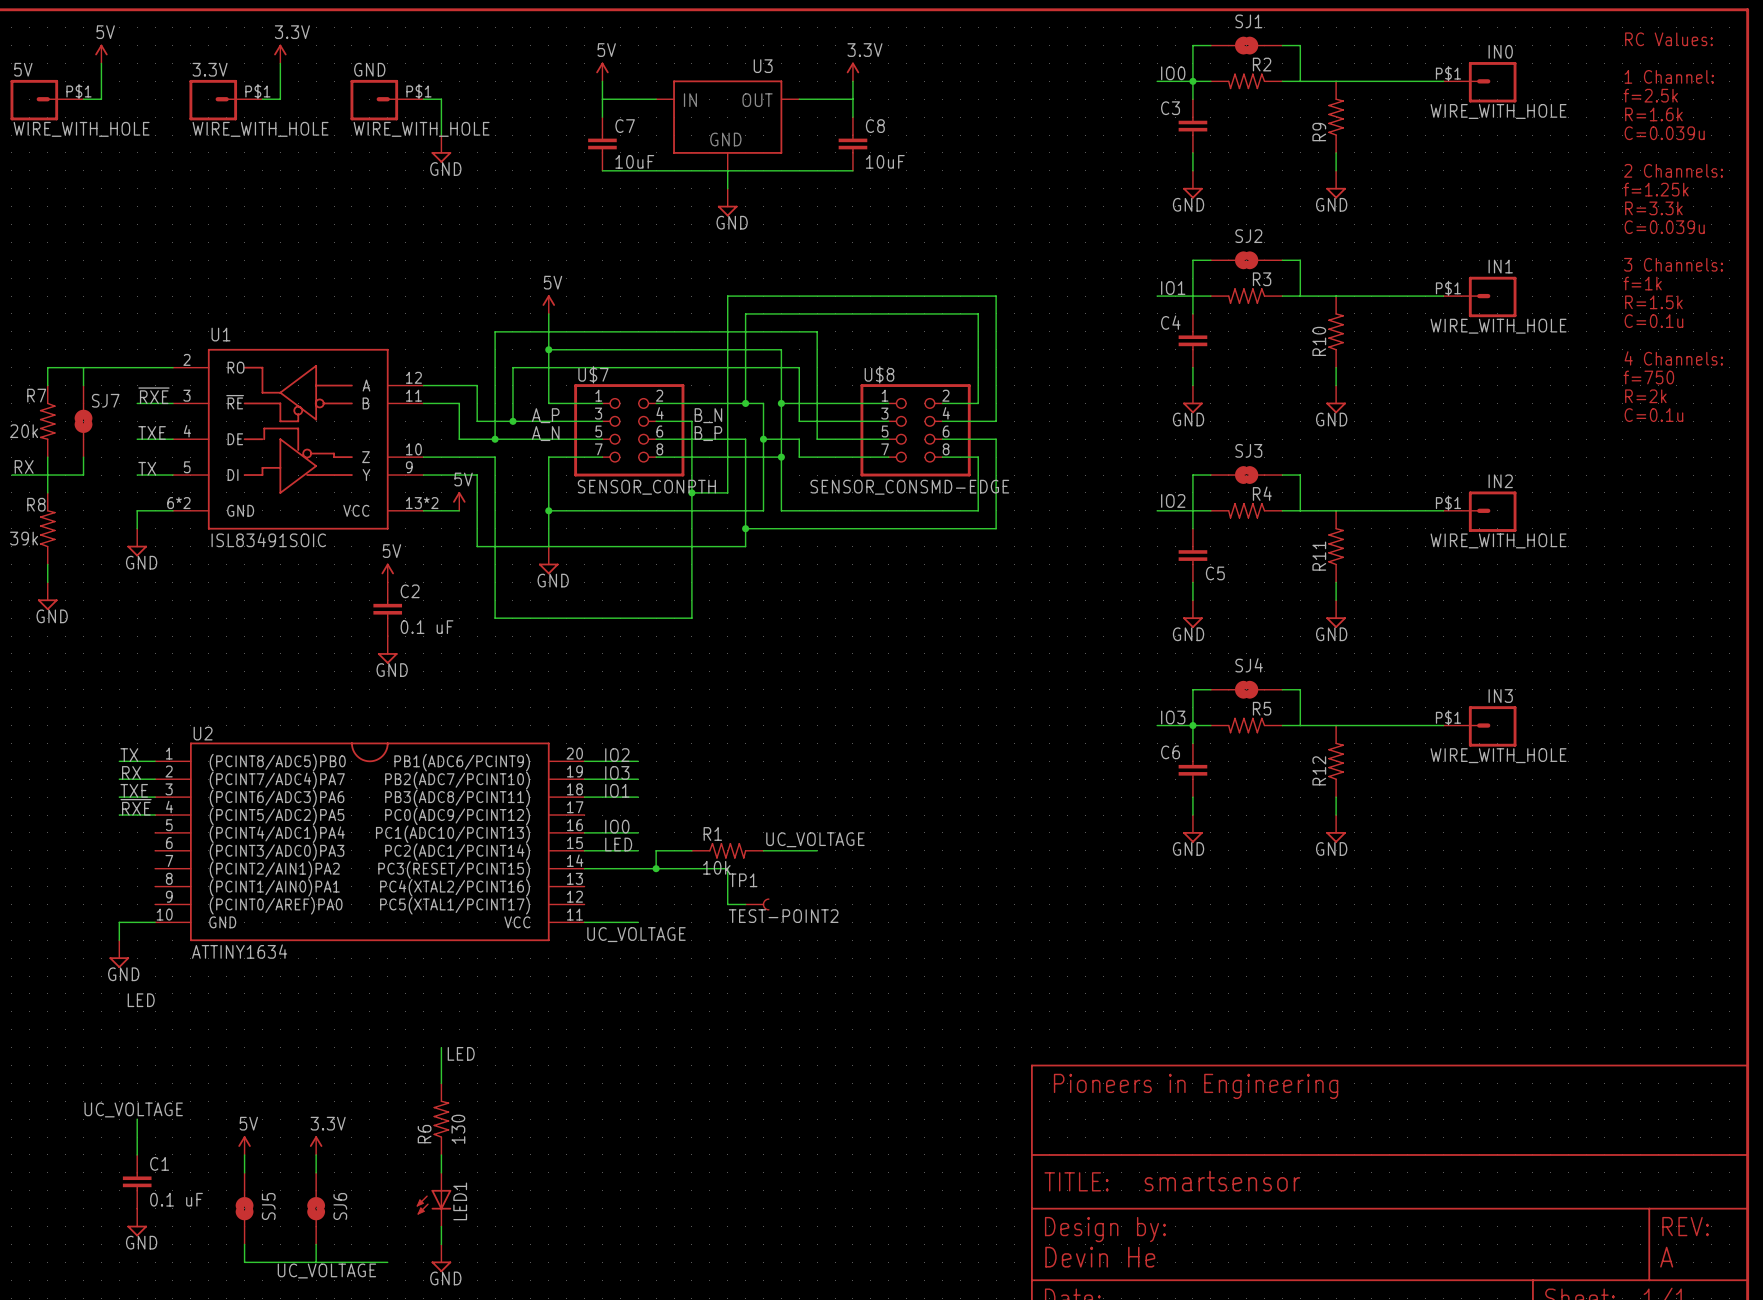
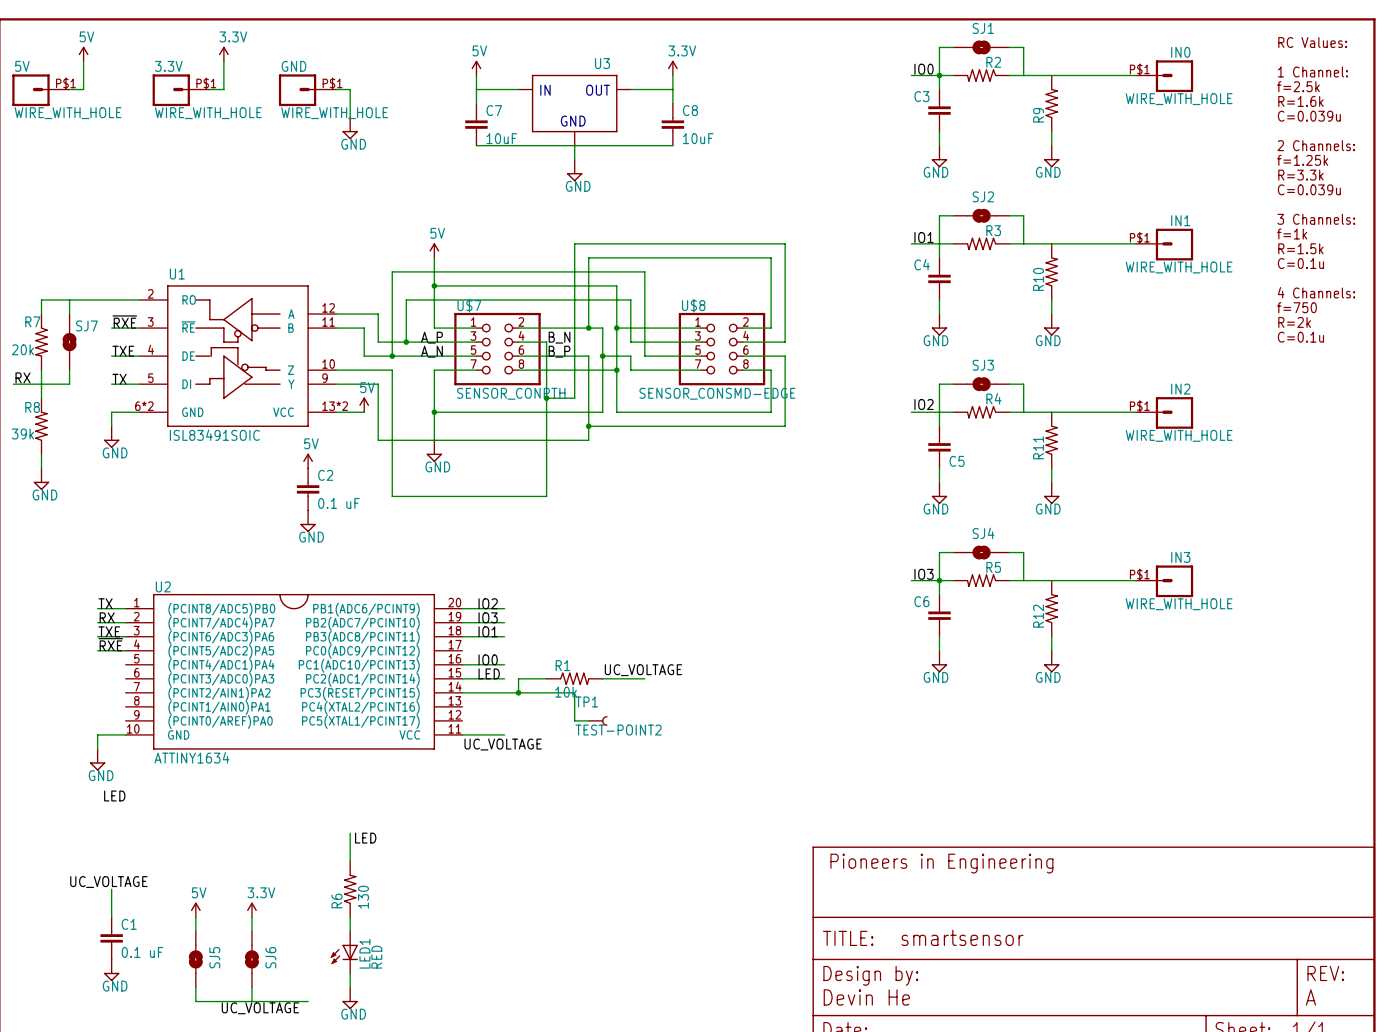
LED1 value: none -> RED (376, 957)

